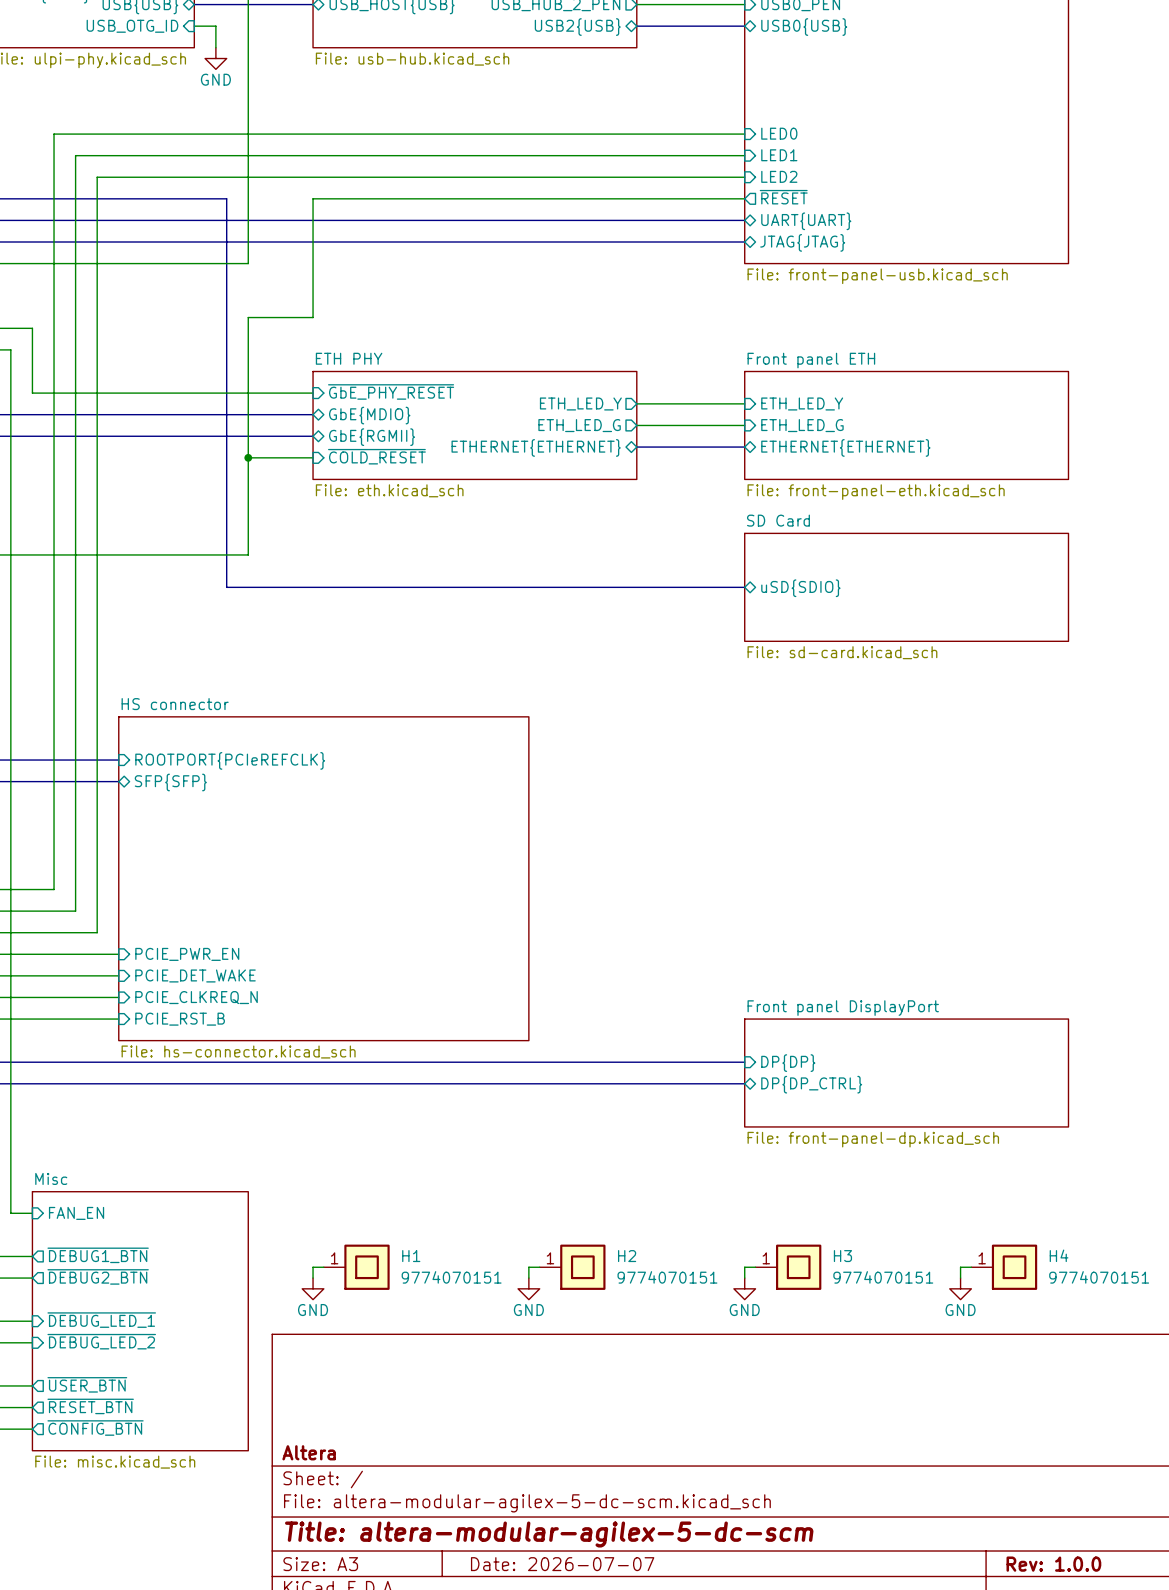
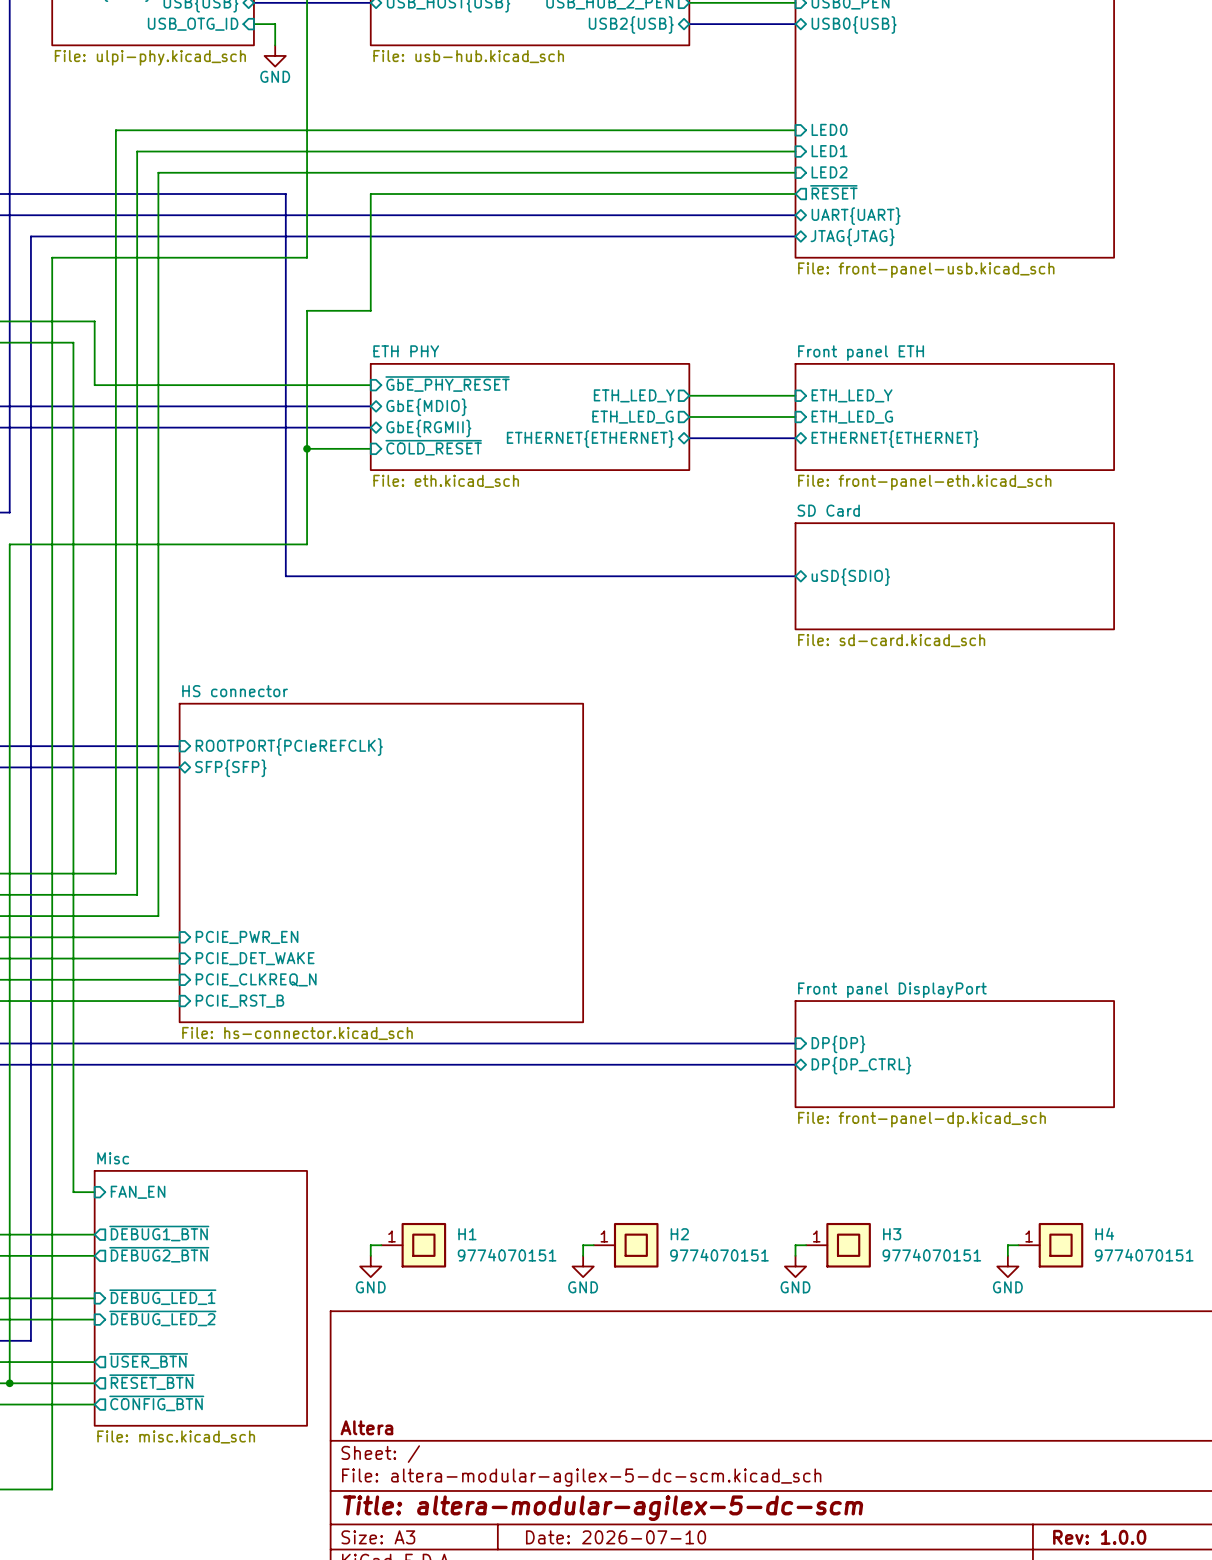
title block: Date: 2026-07-07 (562, 1564) -> Date: 2026-07-10 (616, 1537)

